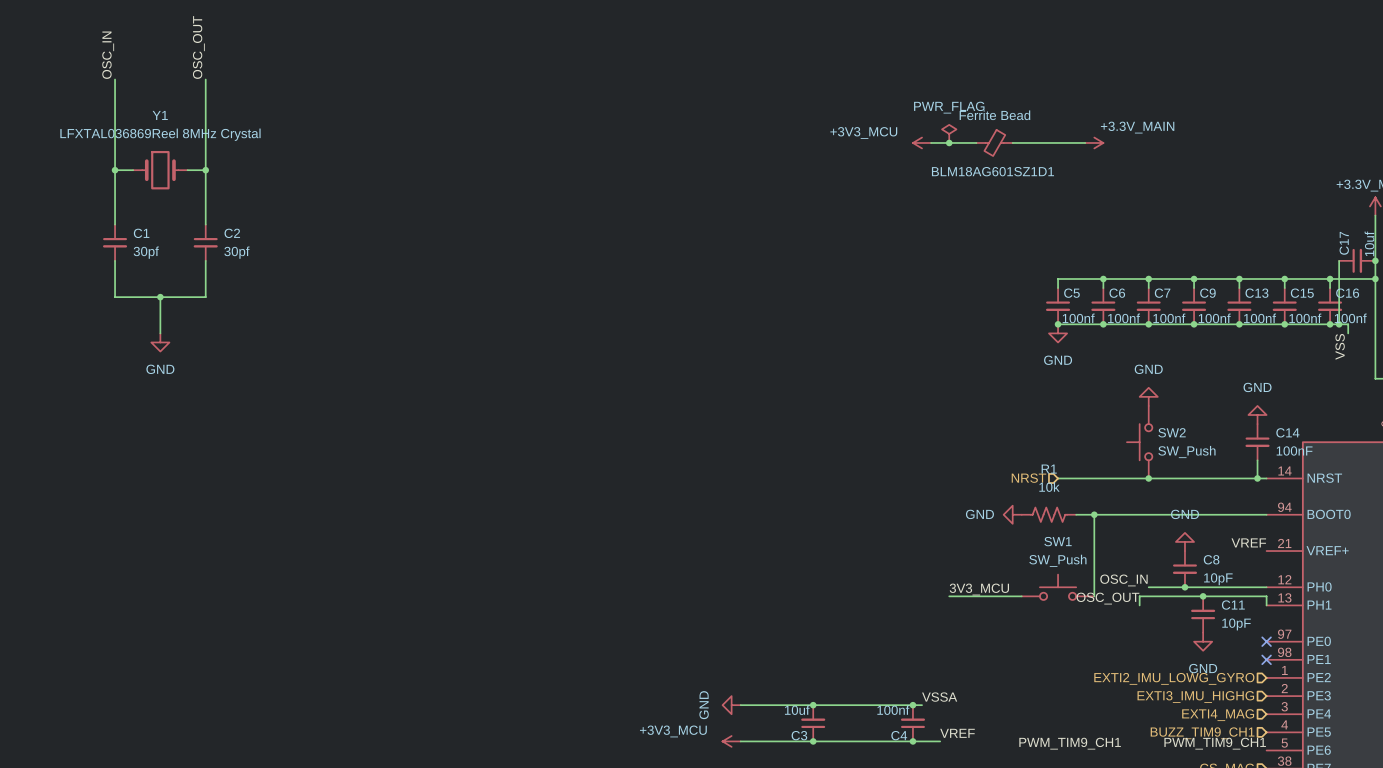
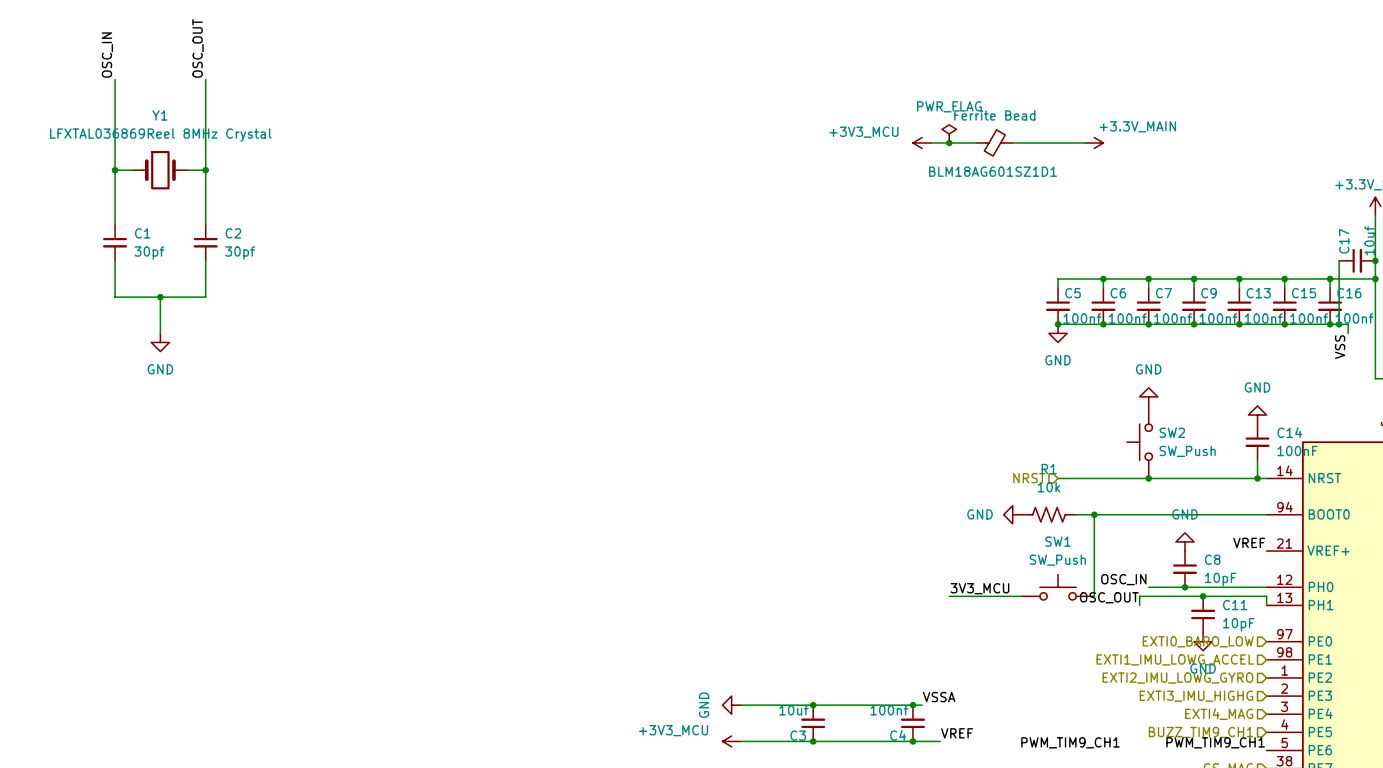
no-connect mark: (1266, 641) -> none
hierarchical label: none -> EXTI0_BARO_LOW (1198, 641)
no-connect mark: (1266, 659) -> none
hierarchical label: none -> EXTI1_IMU_LOWG_ACCEL (1175, 659)

